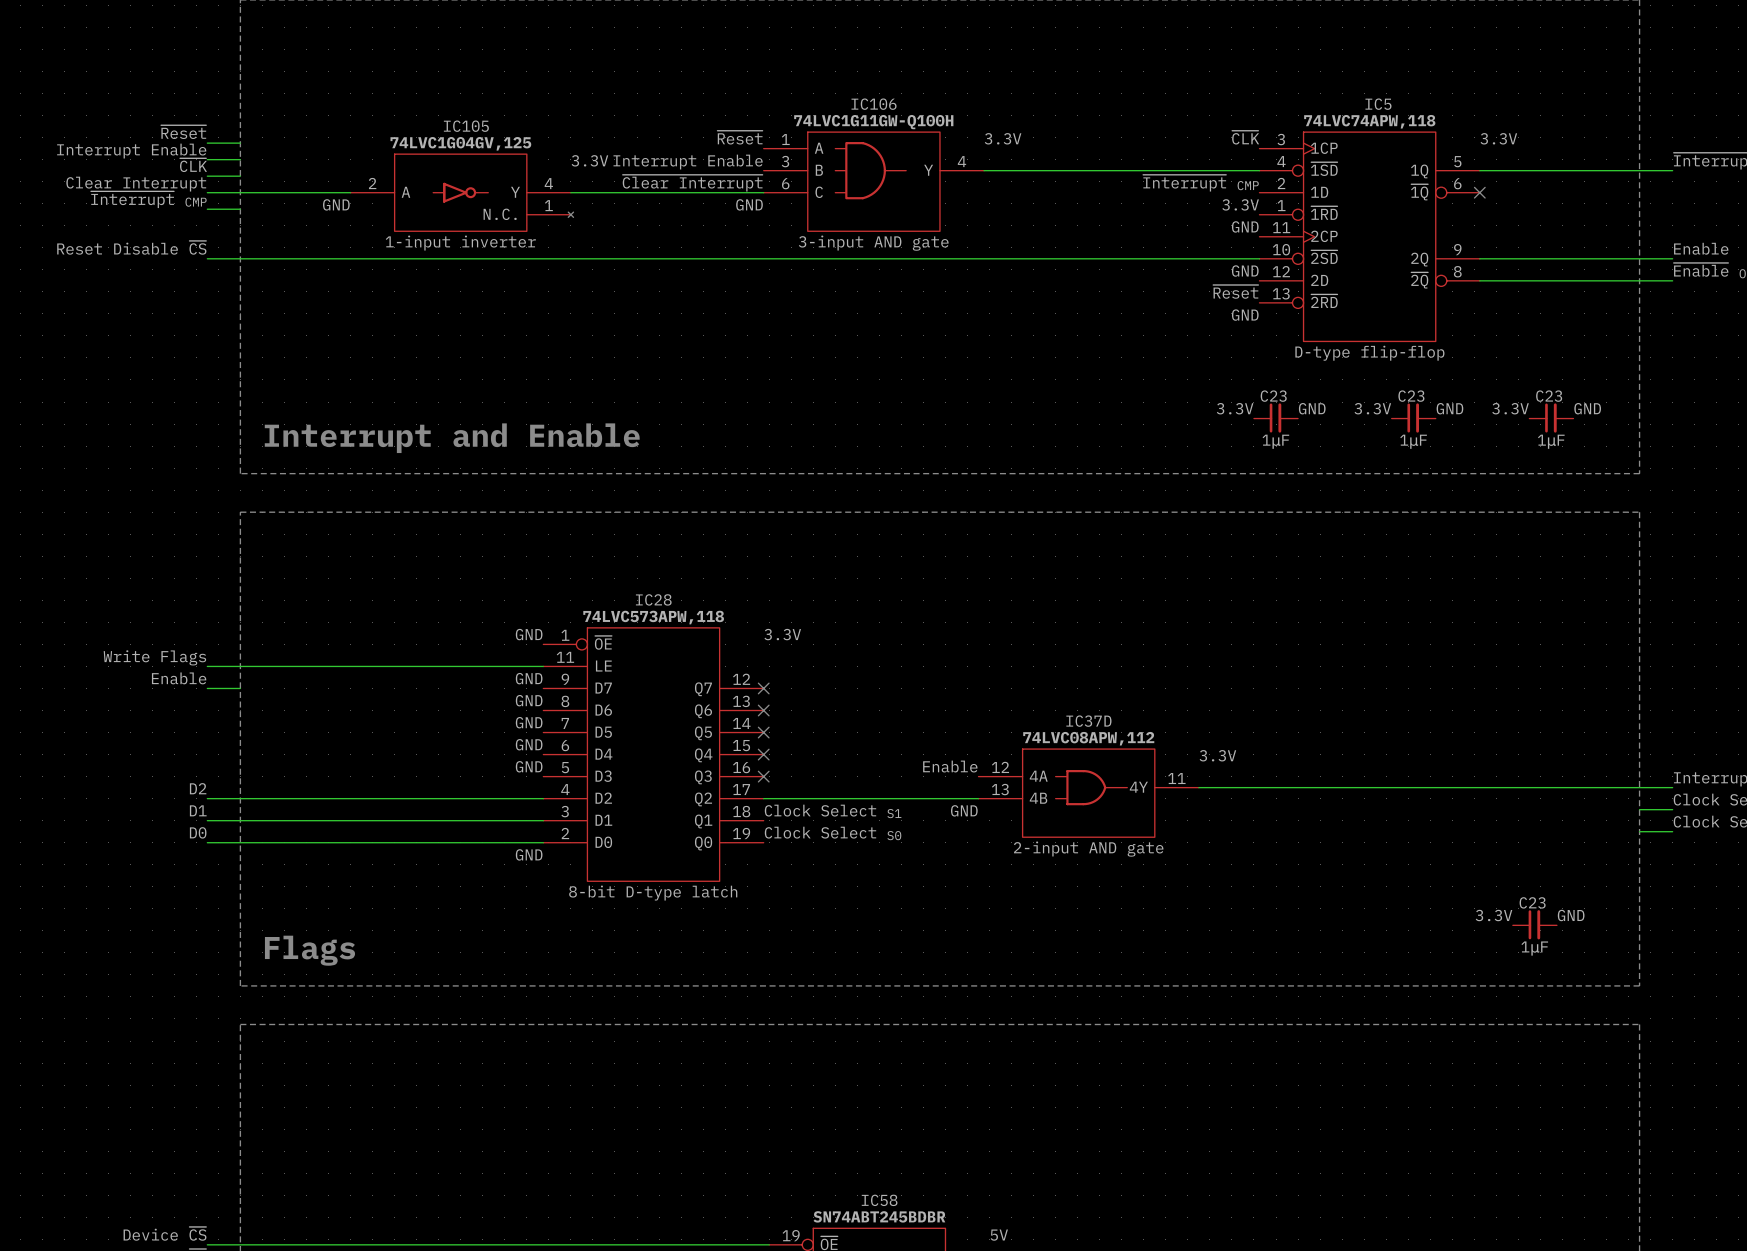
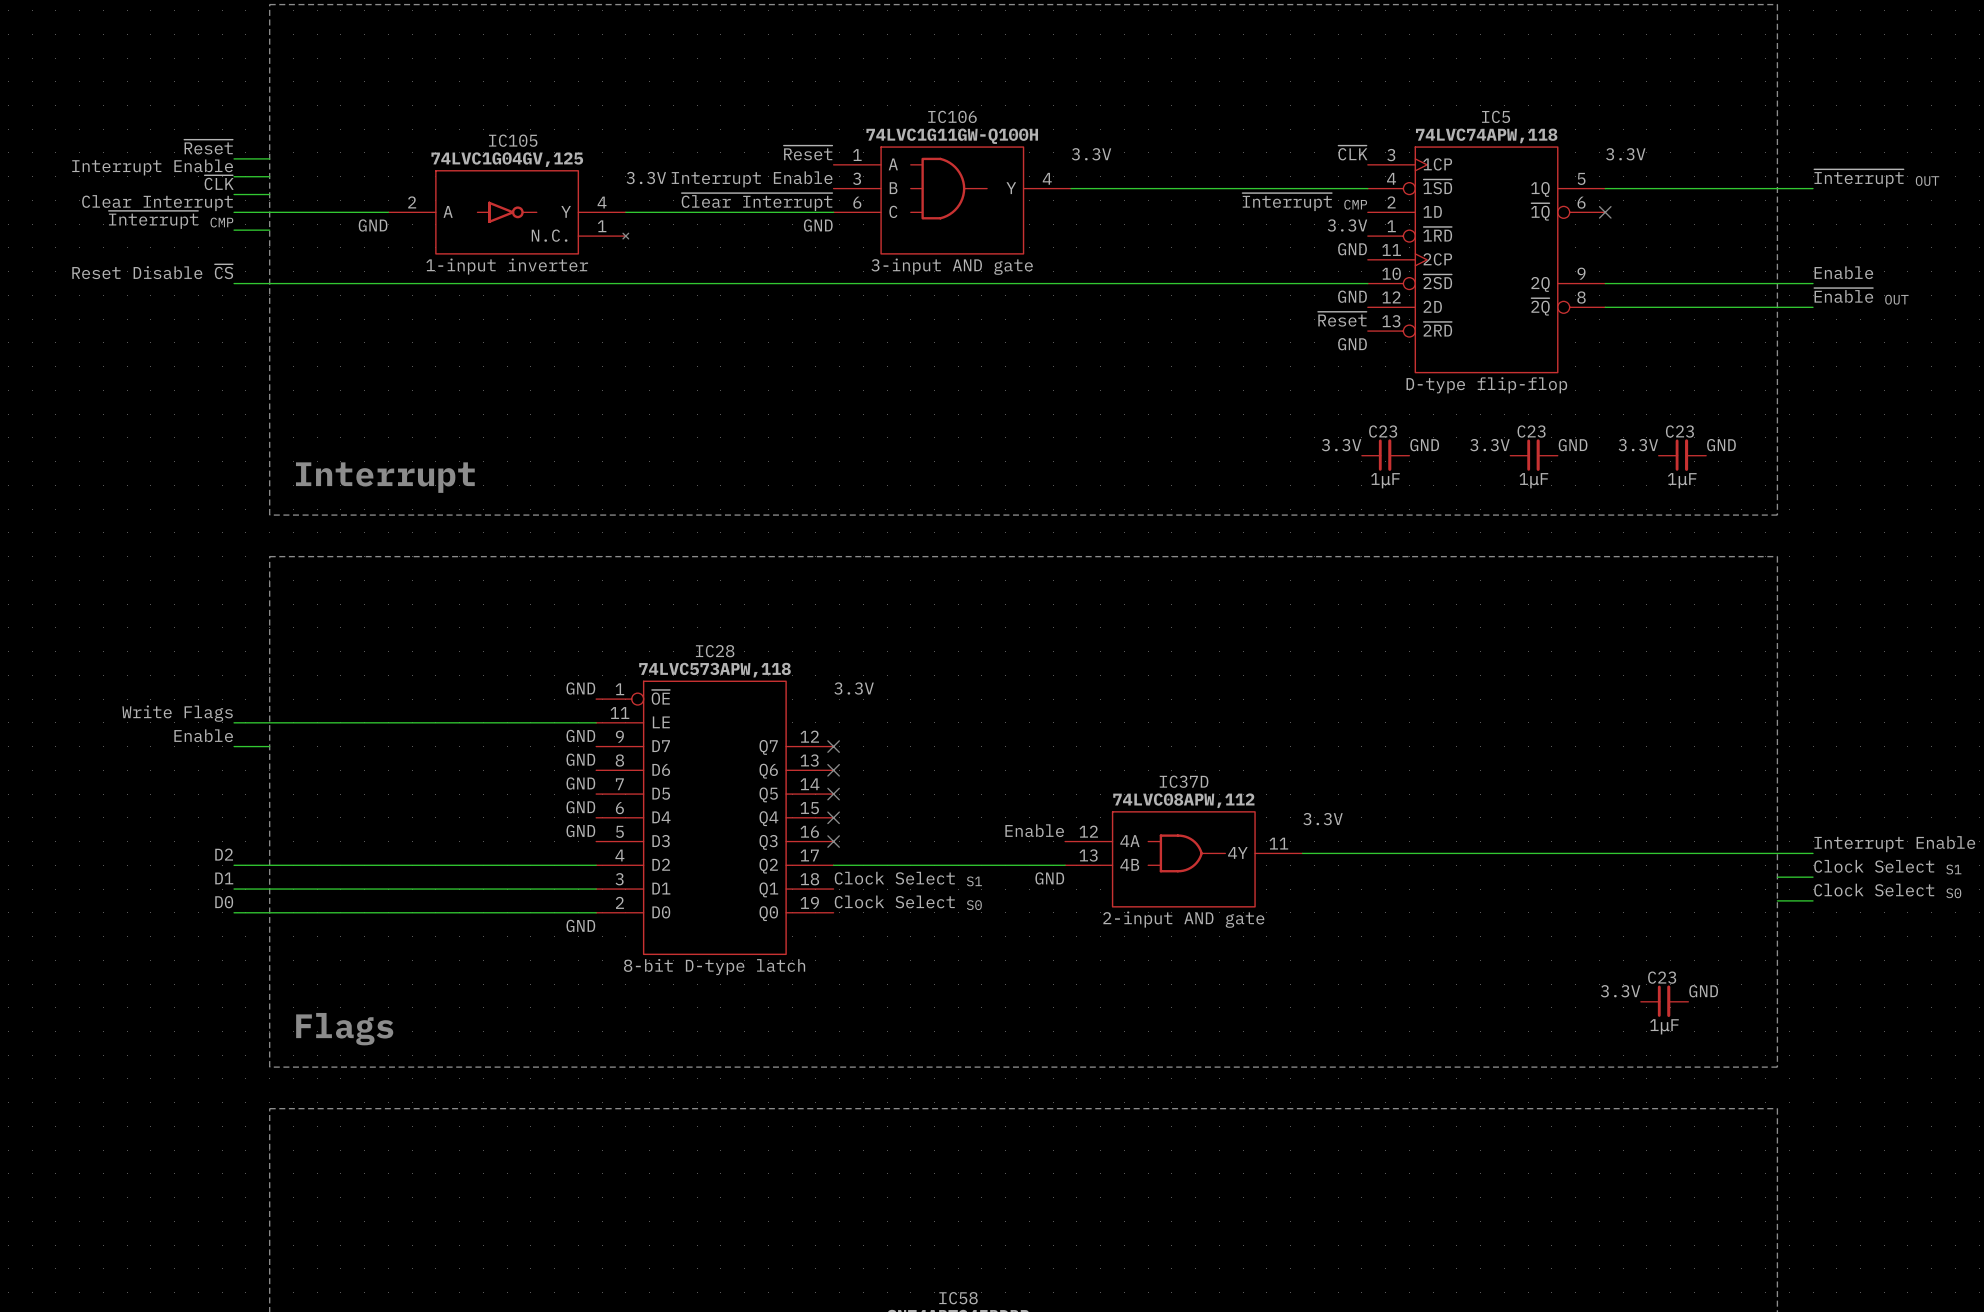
text: Interrupt and Enable (452, 438) -> Interrupt (385, 477)

